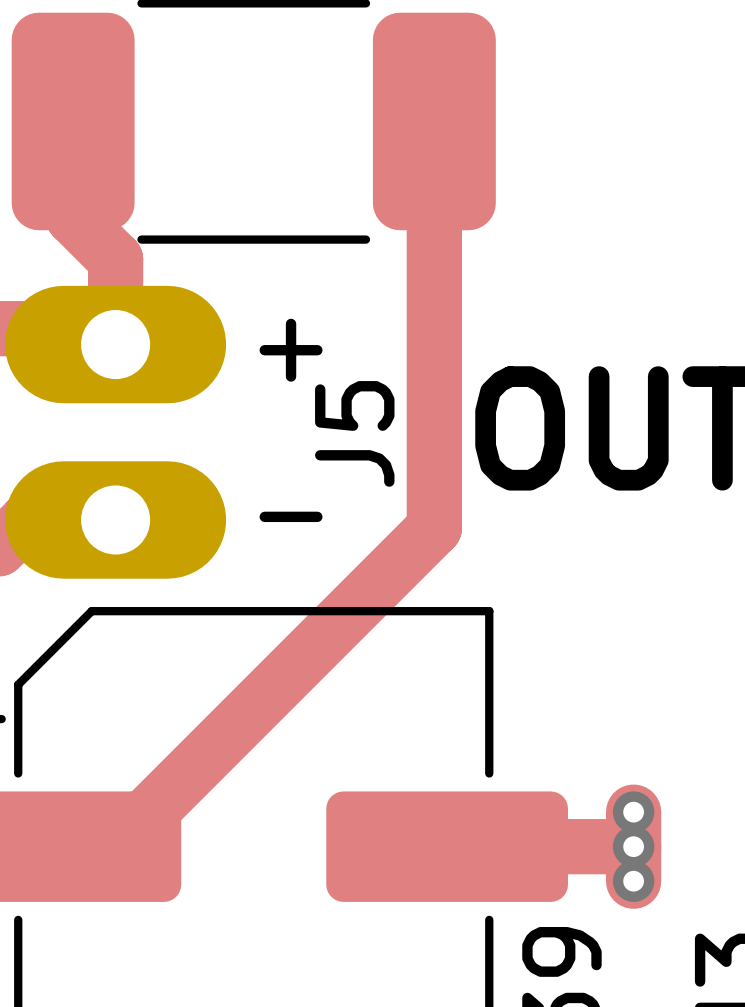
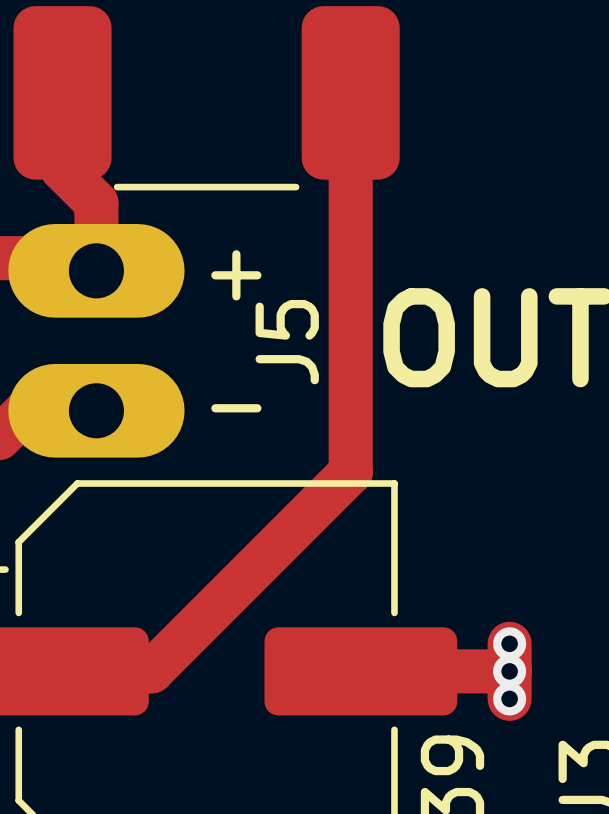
top track: (434, 527) (115, 846) -> (350, 417) (350, 472) (151, 671) (96, 671)

